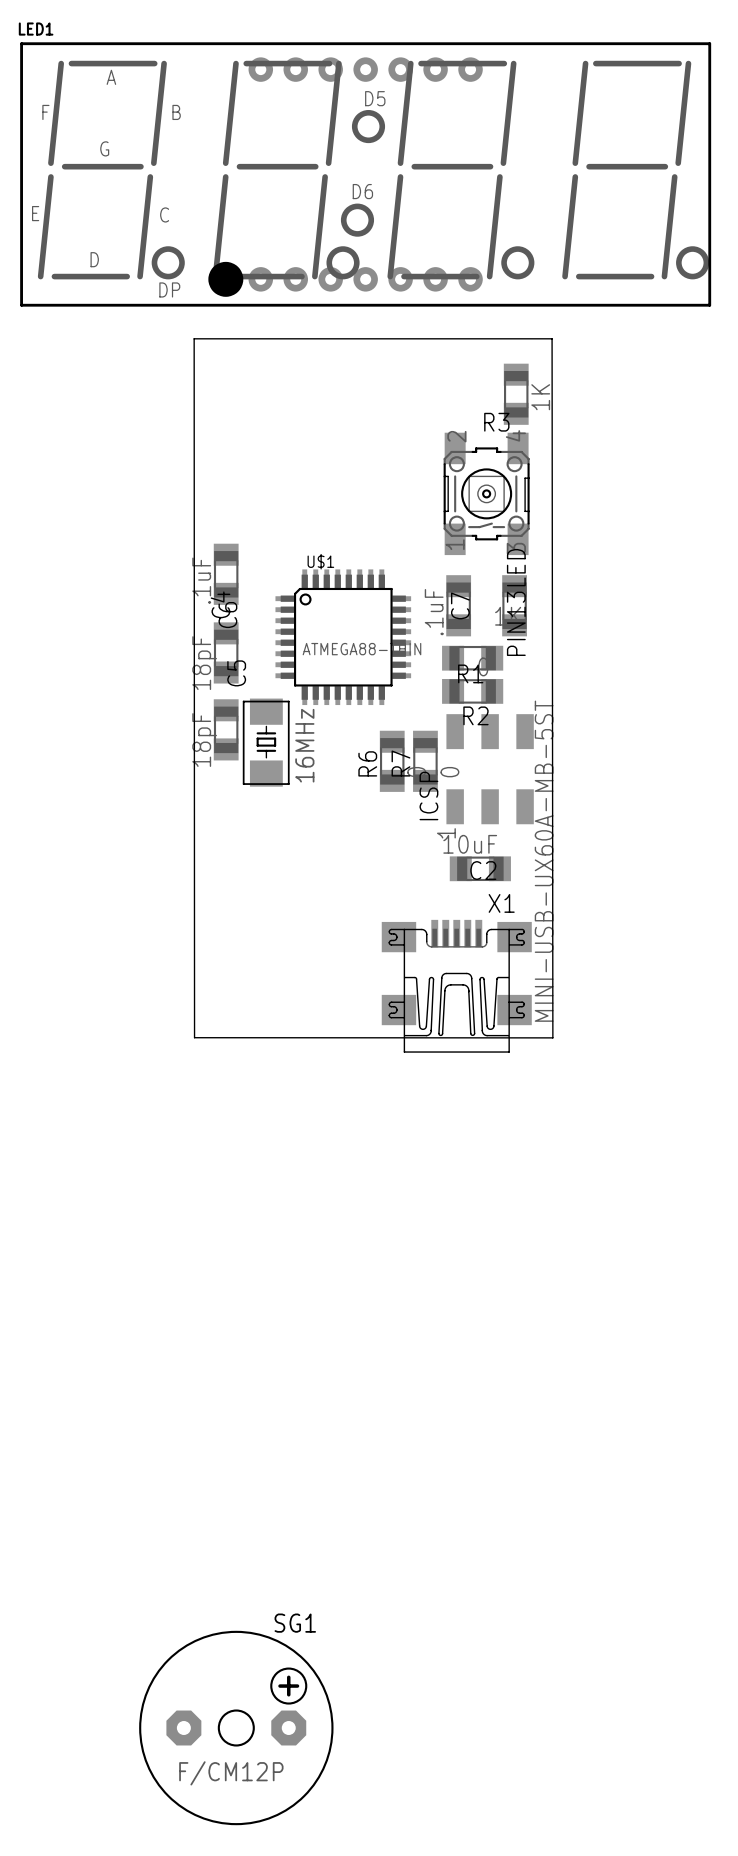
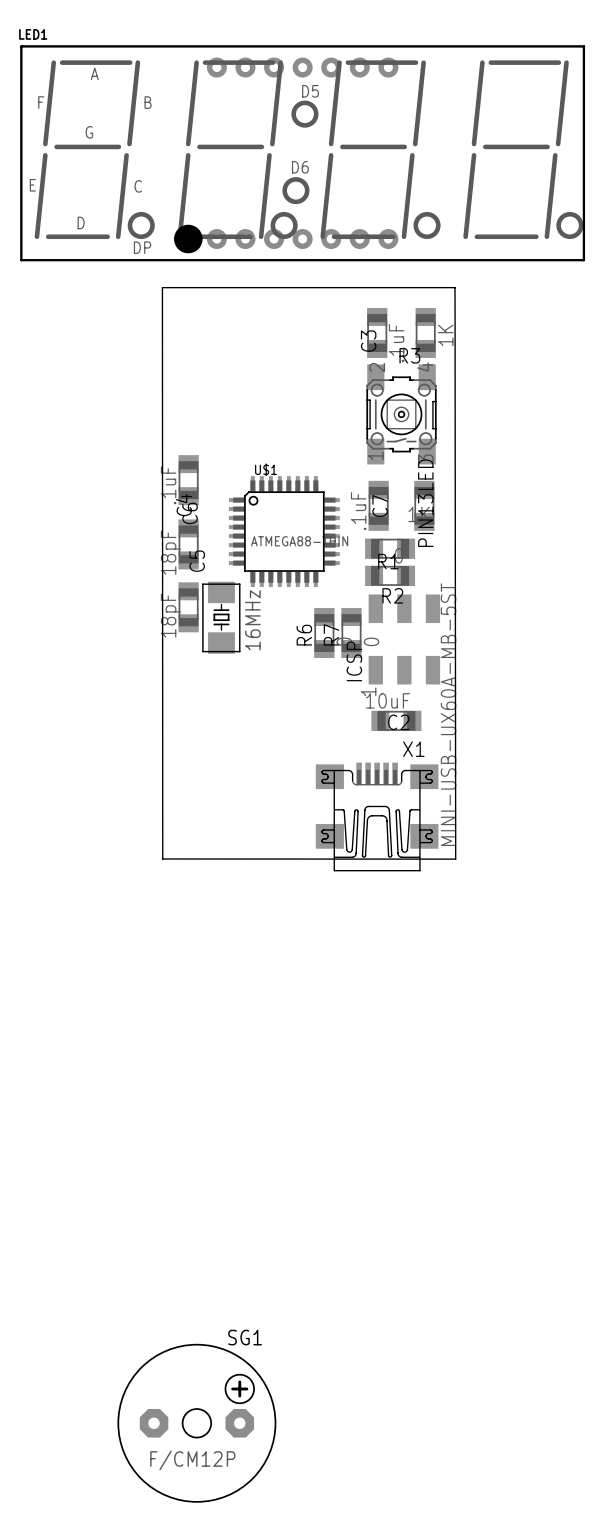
C3: none -> .1uF (377, 332)

